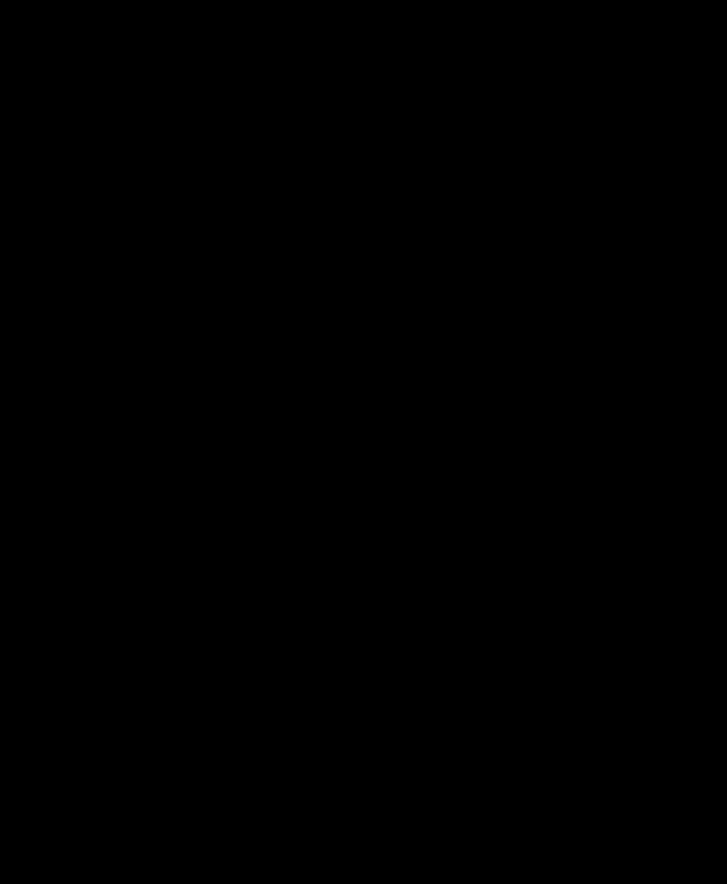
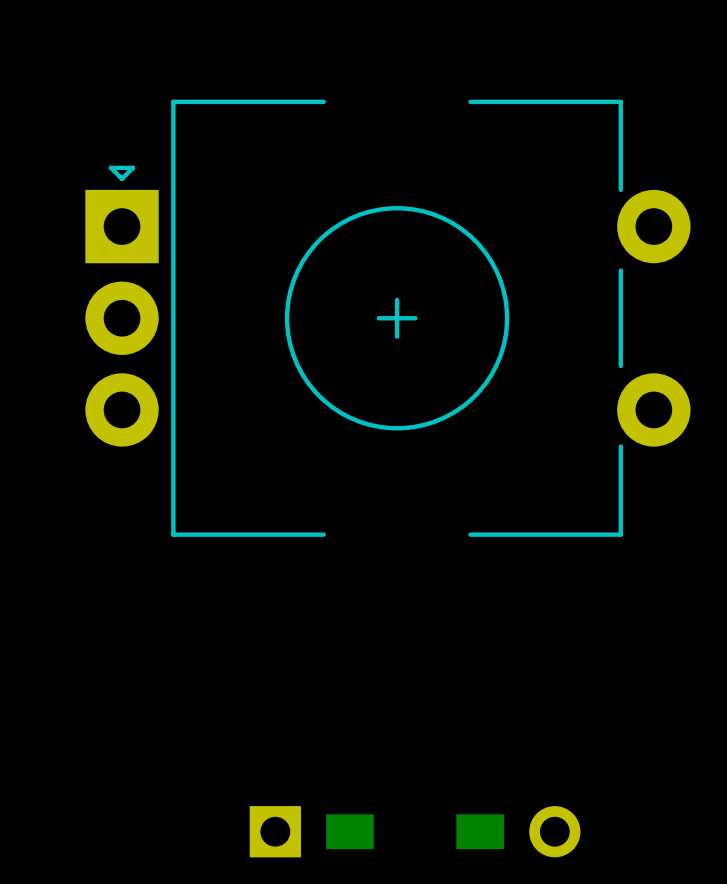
part: none -> (387, 318)
part: none -> (415, 831)

